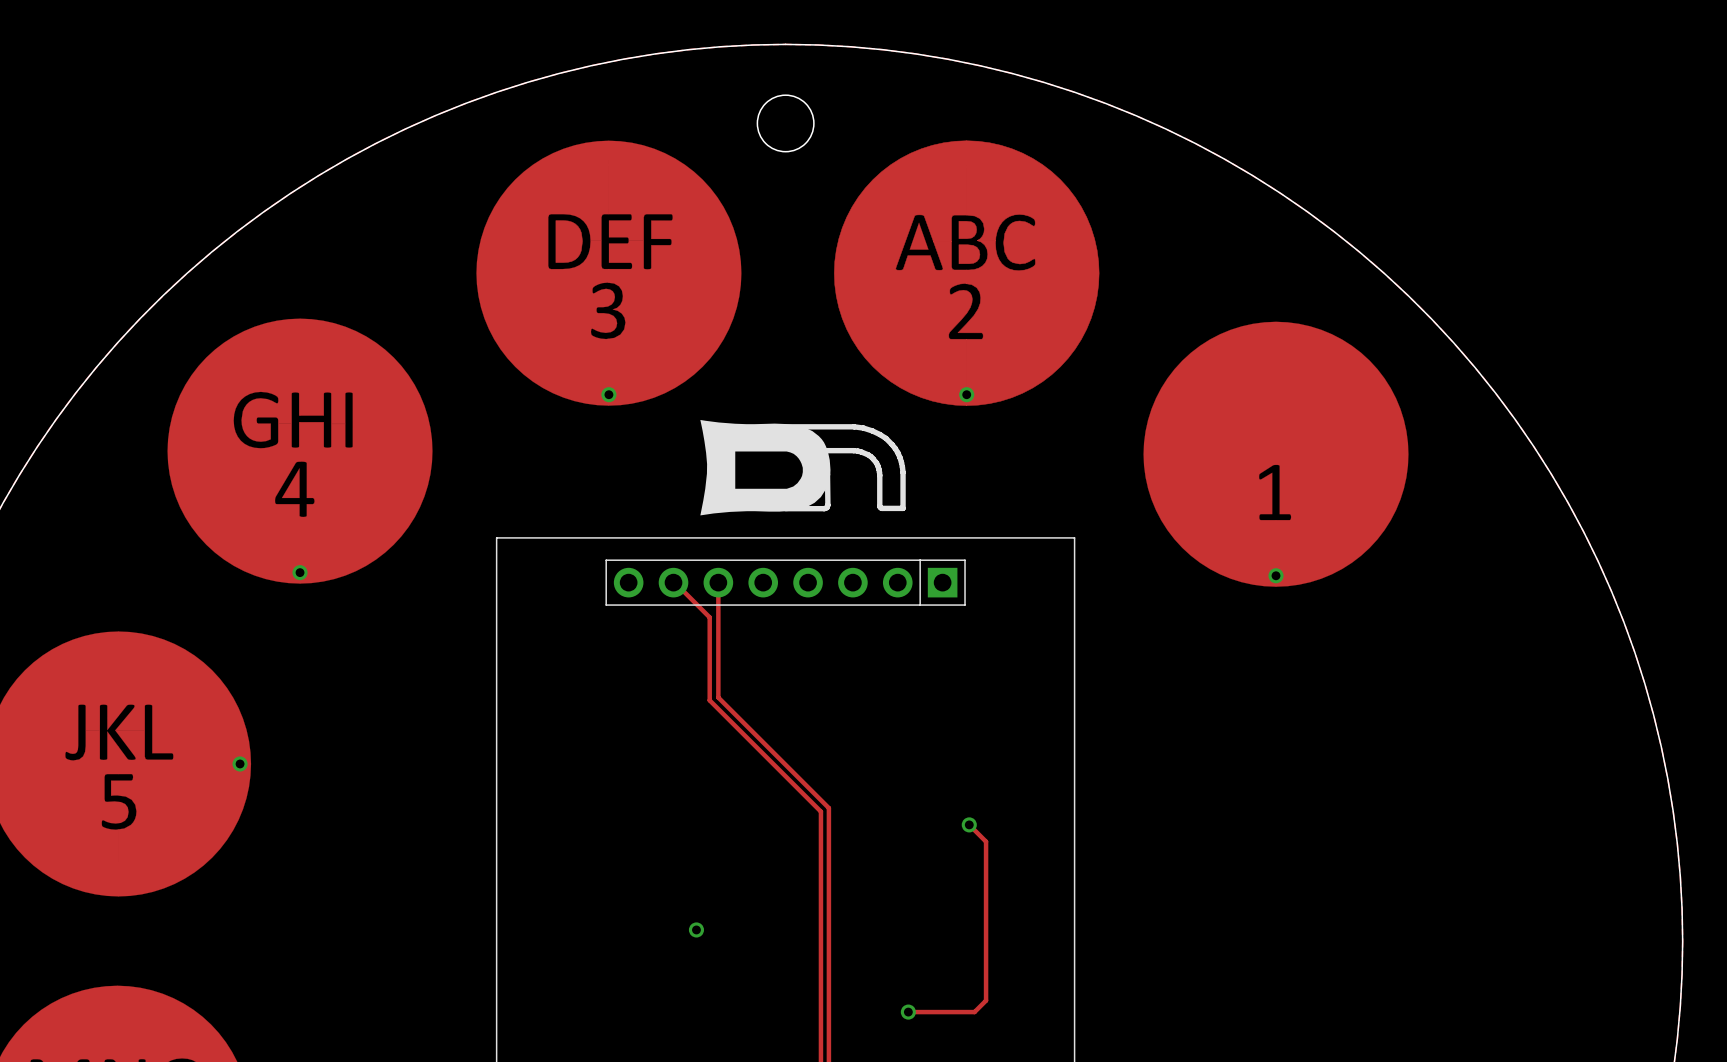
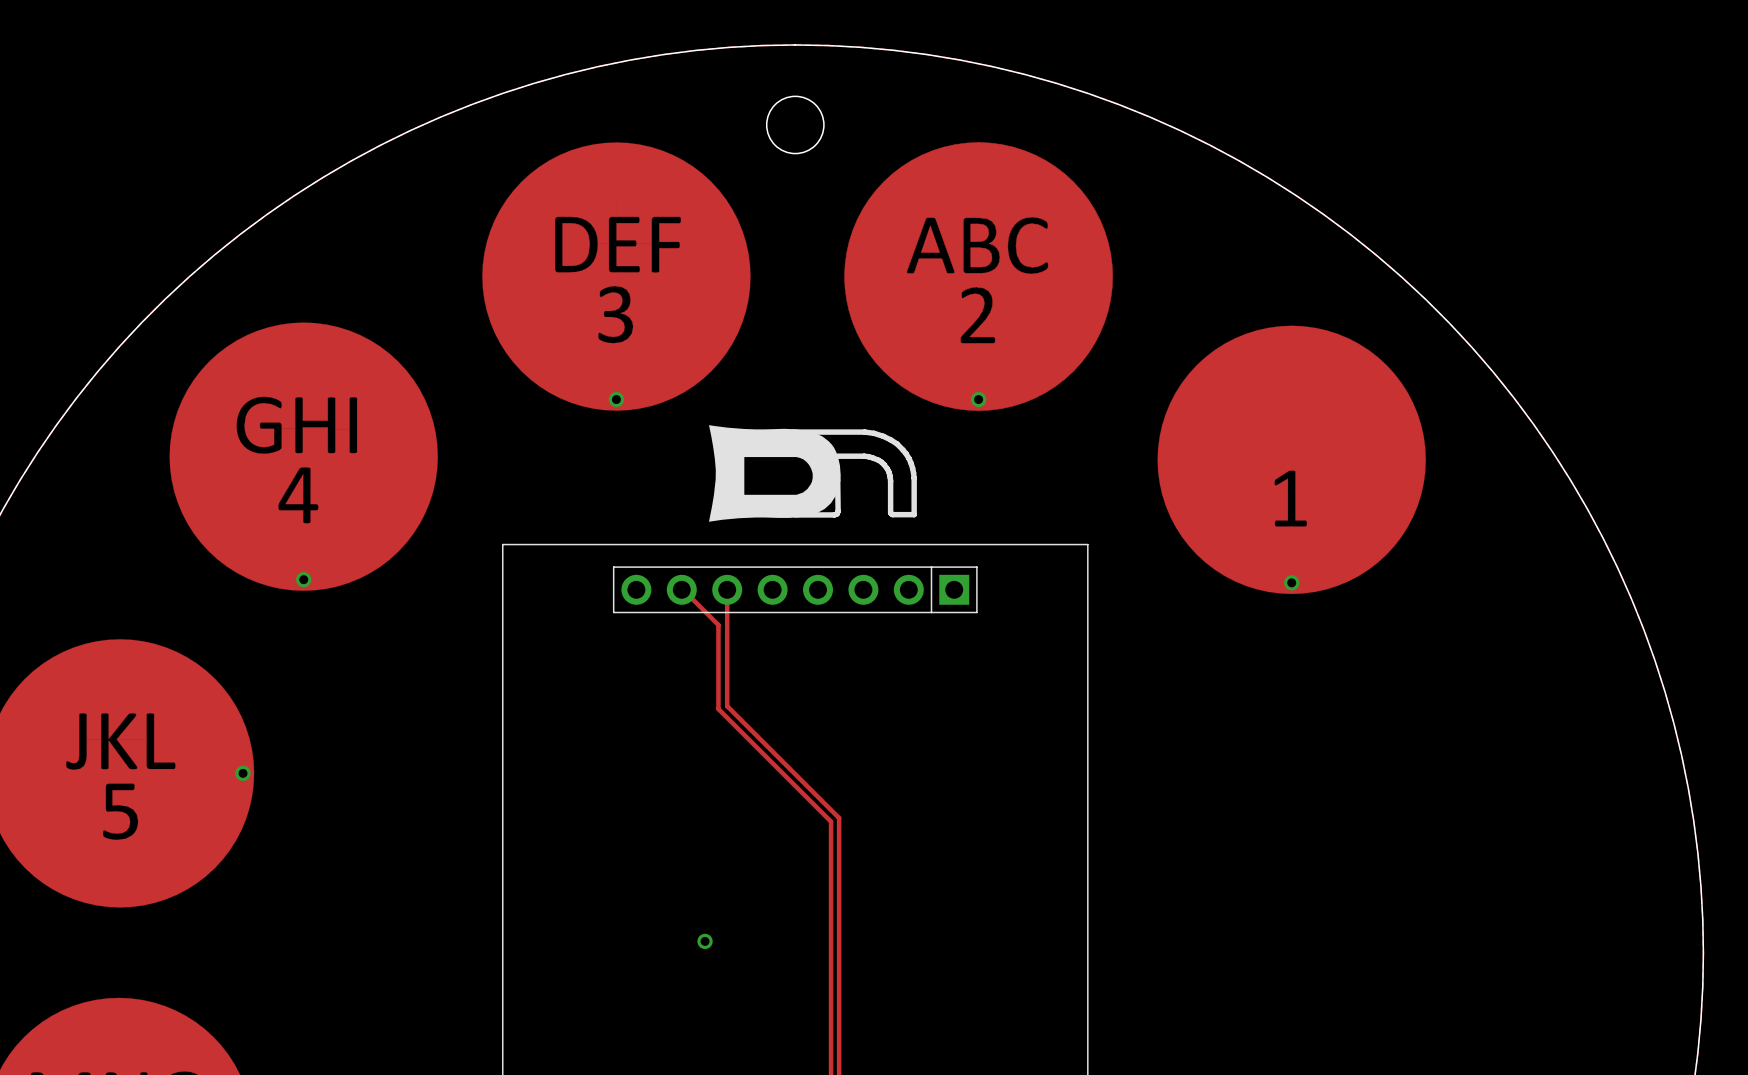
track: (969, 824) (986, 841) (986, 1000) (974, 1012) (908, 1012) -> none
via: (969, 824) -> none
via: (908, 1012) -> none

